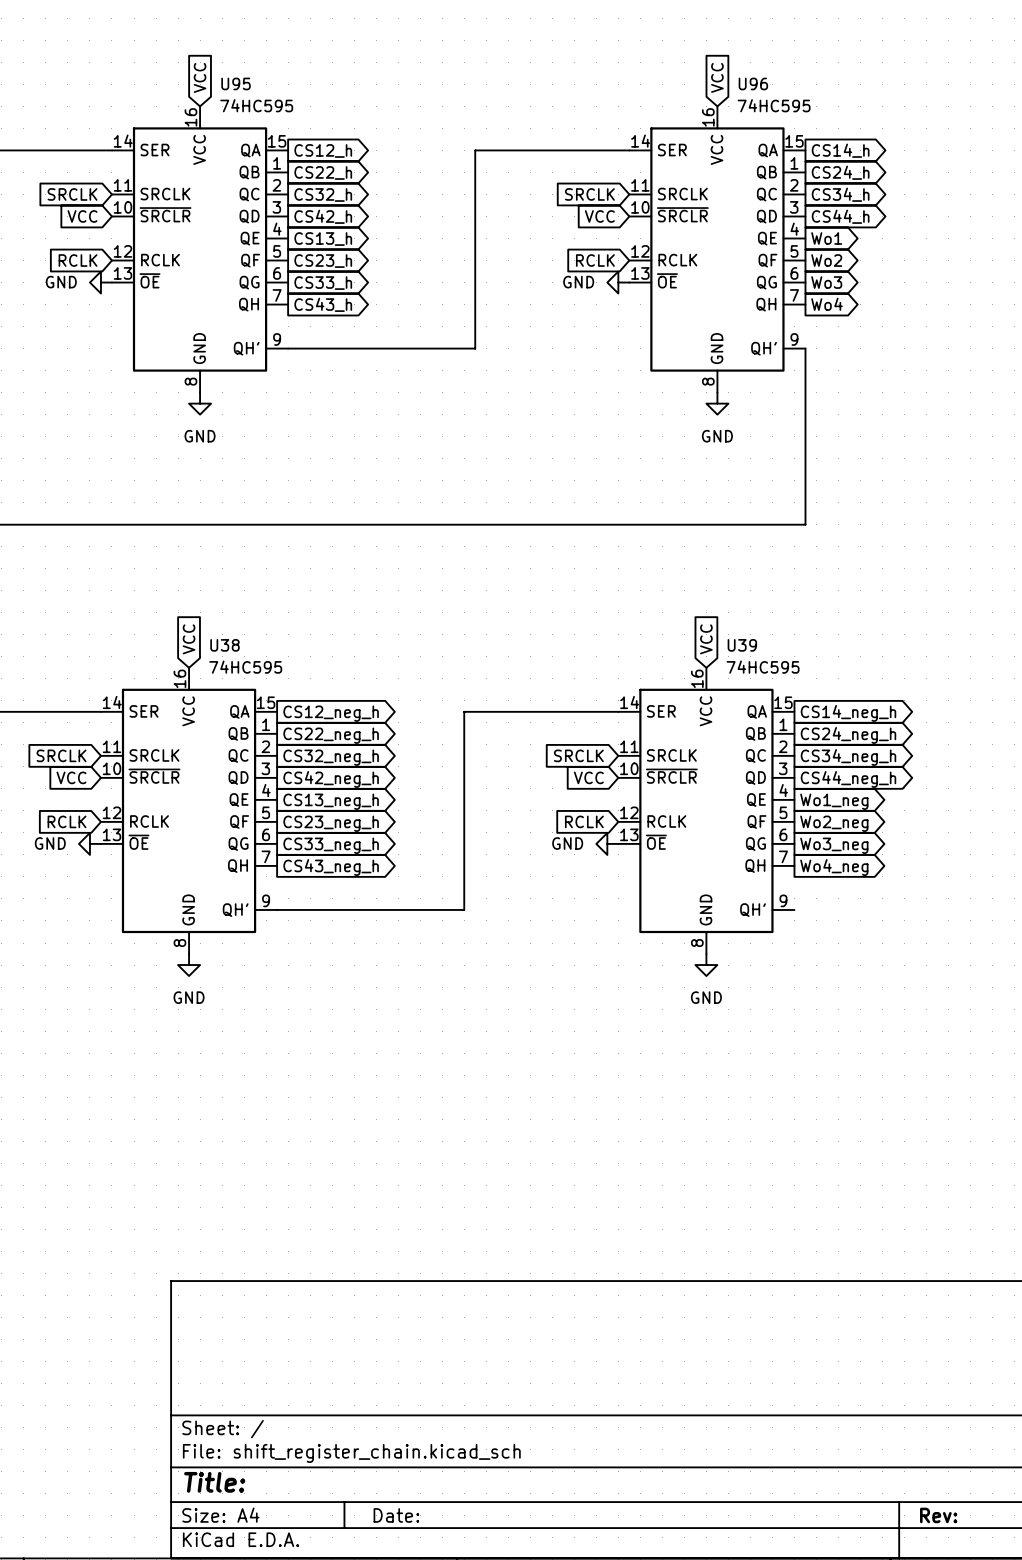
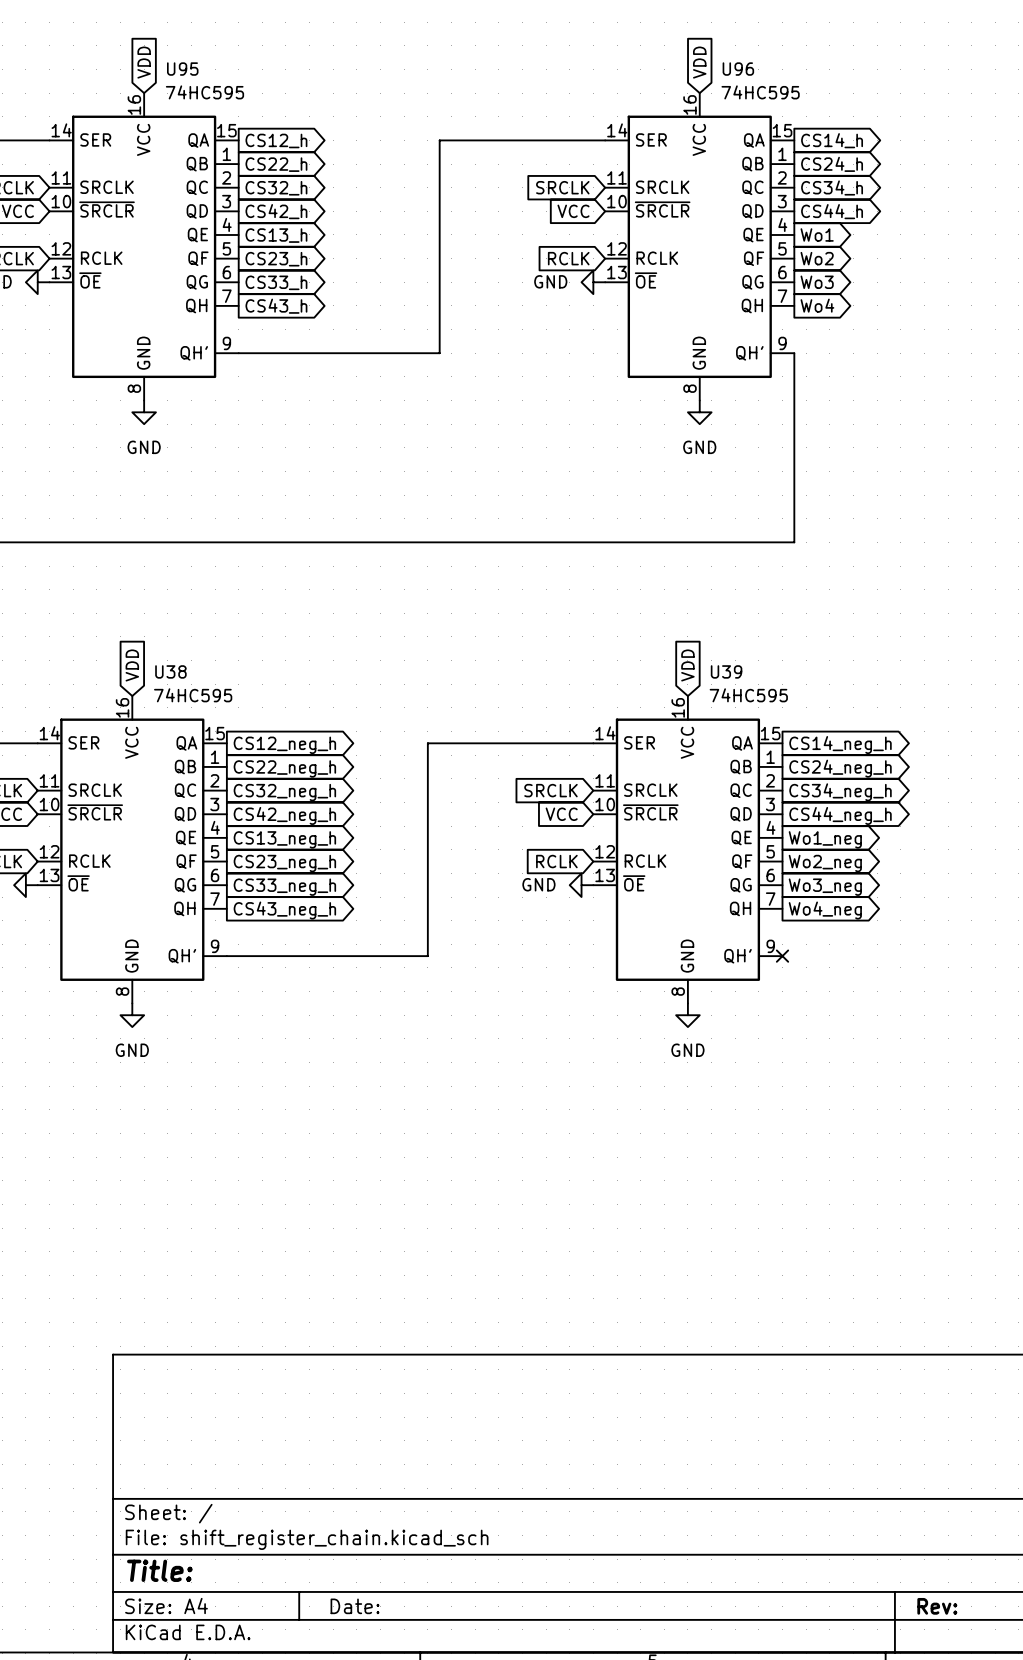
global label: VCC (200, 77) -> VDD (144, 62)
global label: VCC (717, 77) -> VDD (699, 62)
global label: VCC (189, 639) -> VDD (132, 665)
global label: VCC (706, 639) -> VDD (687, 665)
no-connect mark: none -> (782, 956)

